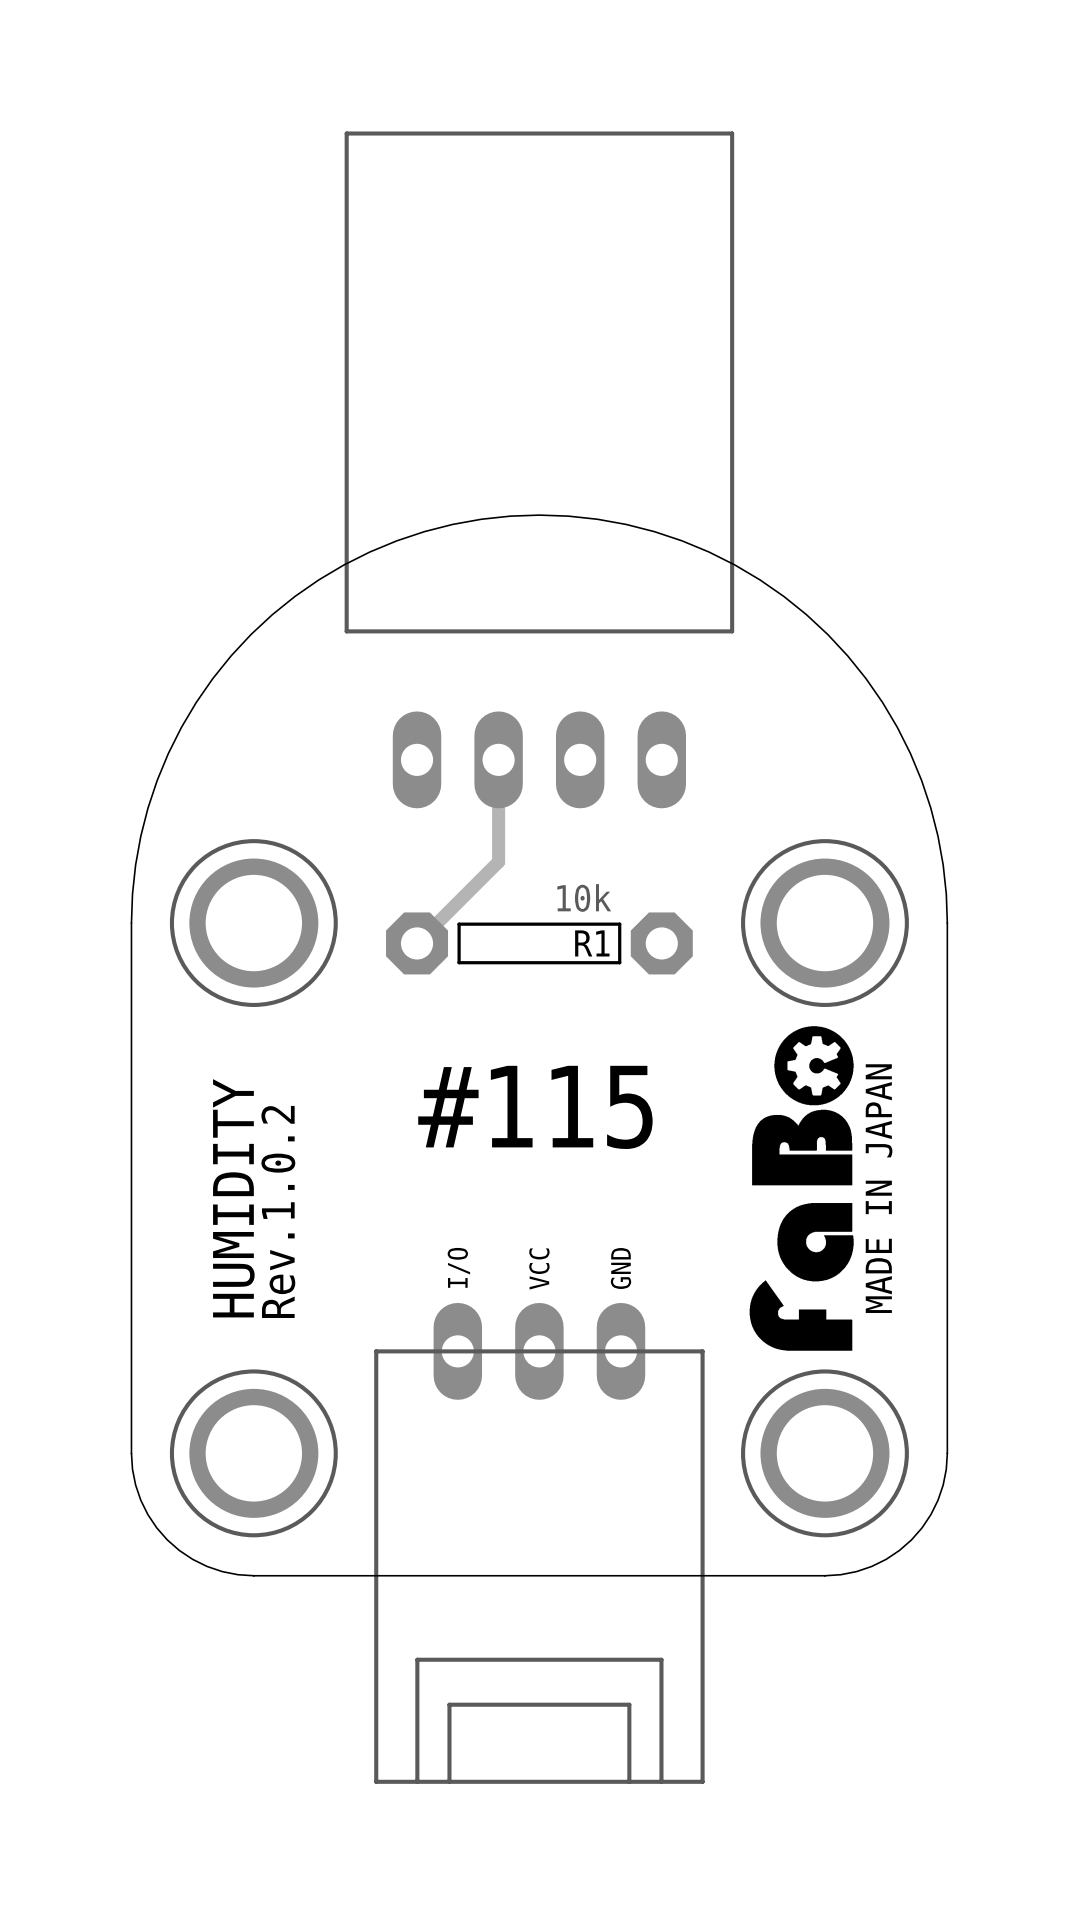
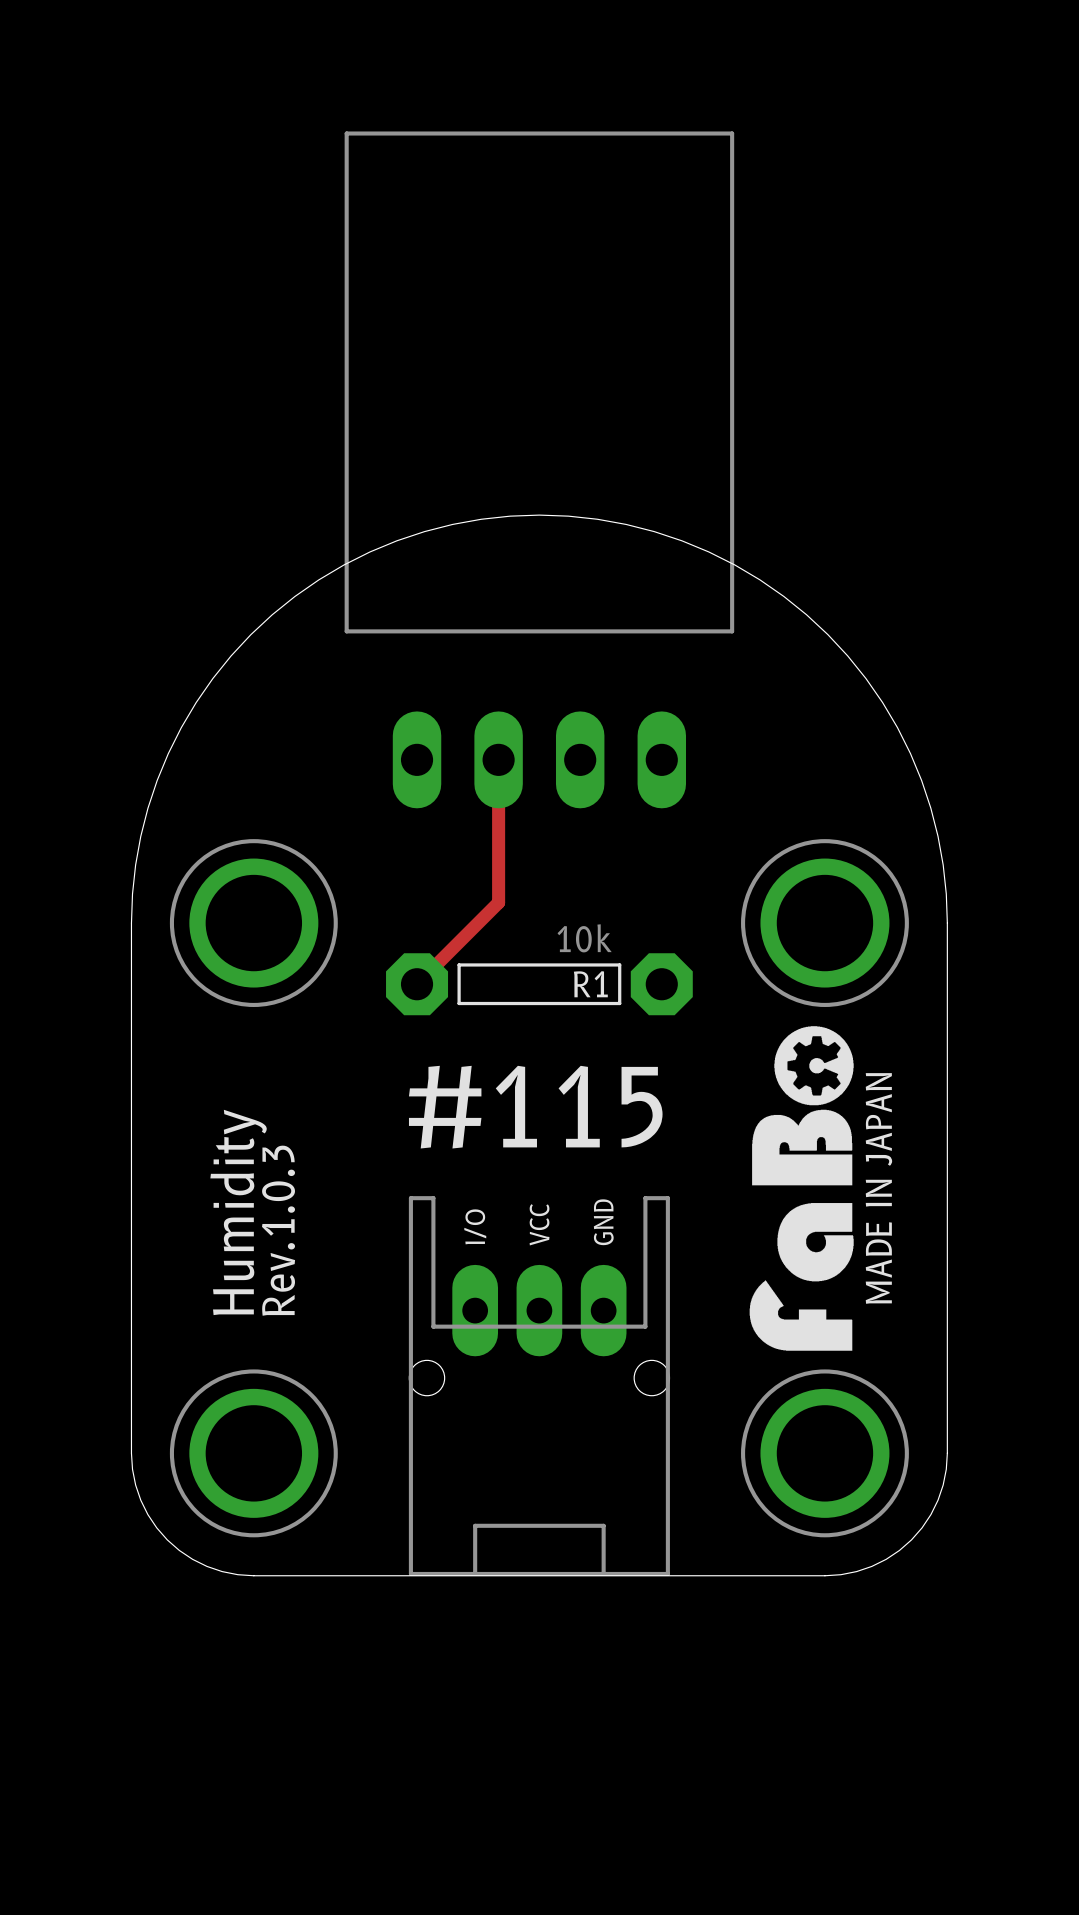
track: (498, 861) (417, 943) -> (498, 861) (498, 902) (417, 984)
R1 position: (539, 943) -> (539, 984)
part: none -> (539, 1045)
part: (539, 1149) -> none
text: HUMIDITY (233, 1198) -> Humidity (238, 1212)
text: Rev.1.0.2 (278, 1211) -> Rev.1.0.3 (278, 1230)

